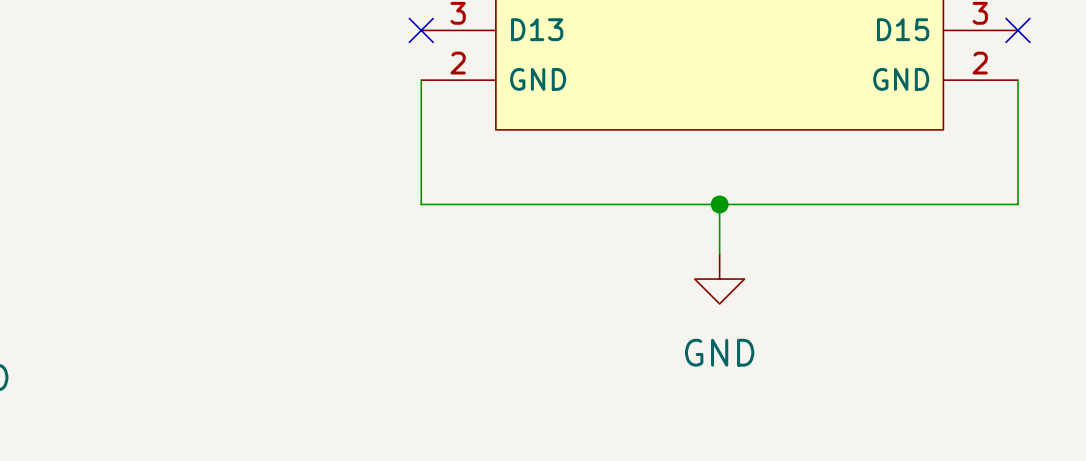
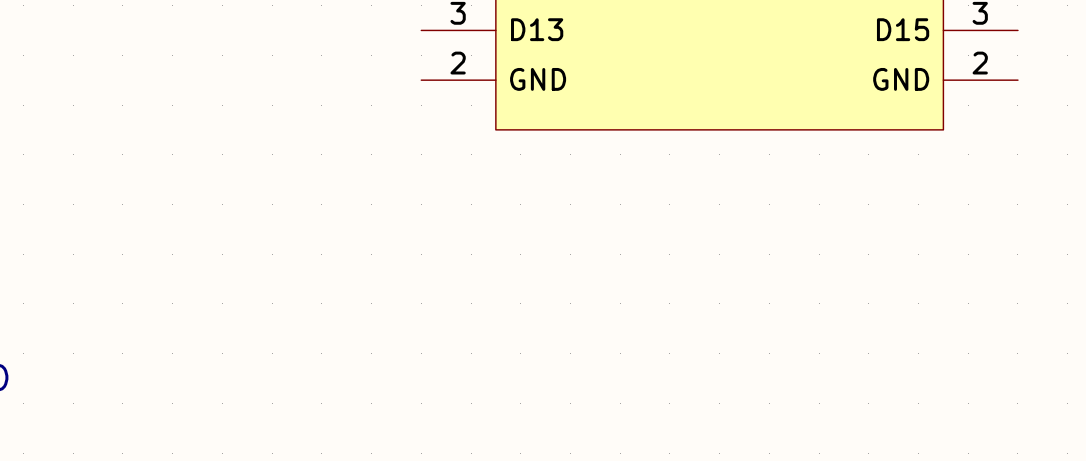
no-connect mark: (421, 30) -> none
no-connect mark: (1017, 30) -> none
wire: (421, 80) (421, 204) (1017, 204) (1017, 80) -> none
wire: (719, 204) (719, 254) -> none
junction: (719, 204) -> none
power symbol: GND (719, 279) -> none

